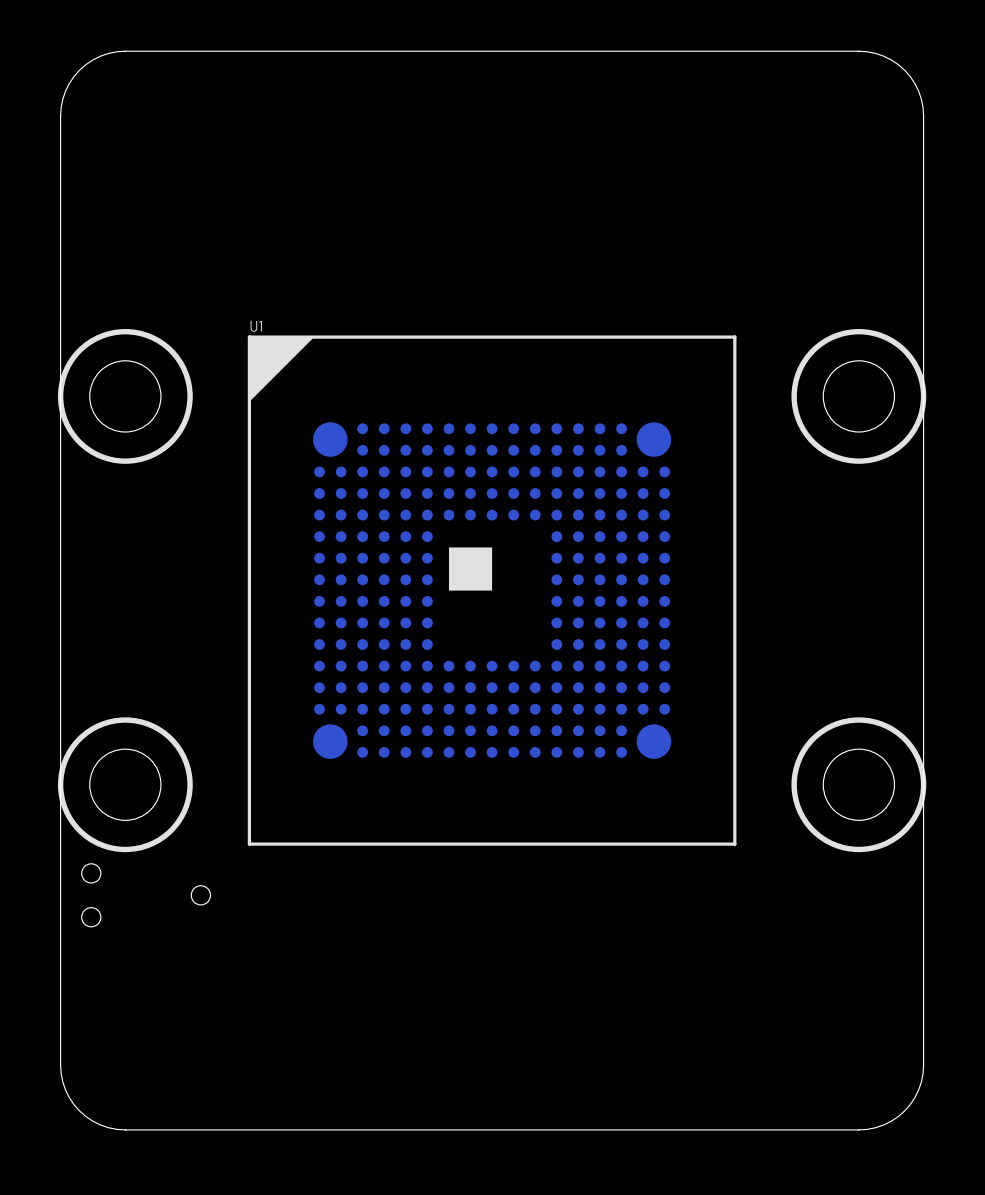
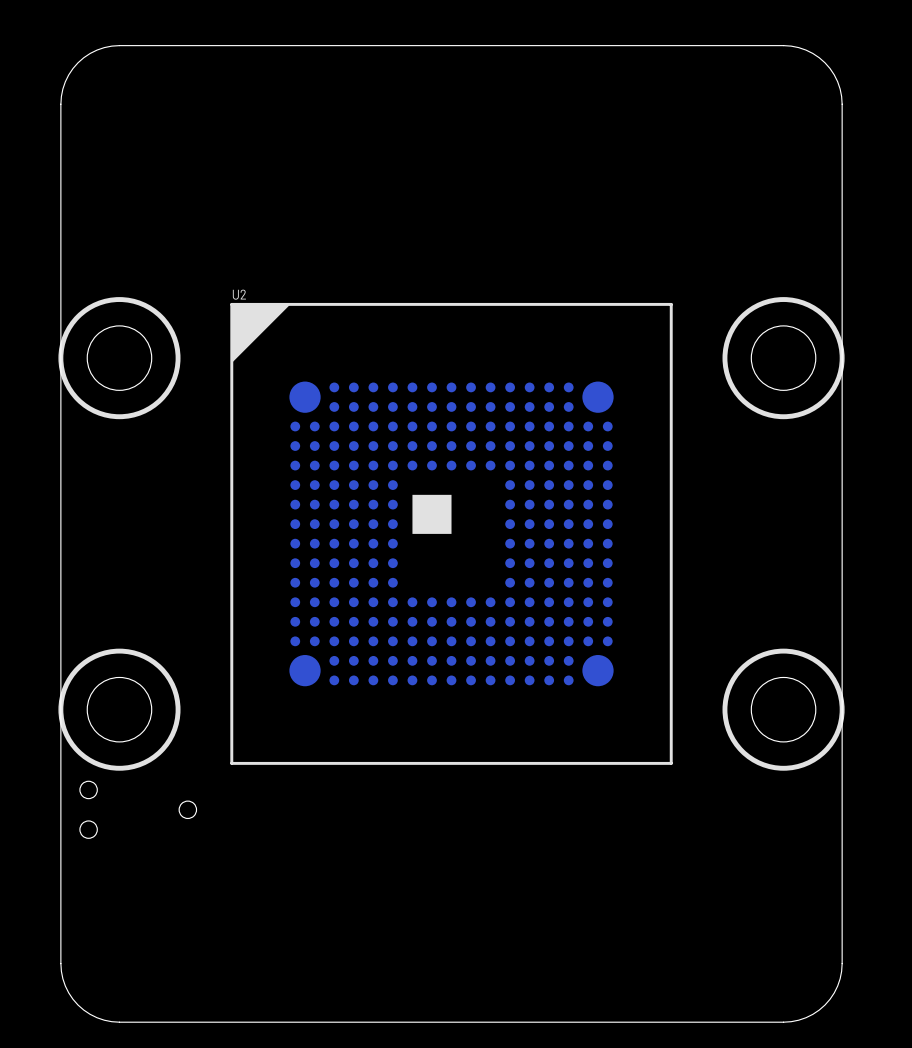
U1 name: U1 (256, 326) -> U2 (239, 294)

